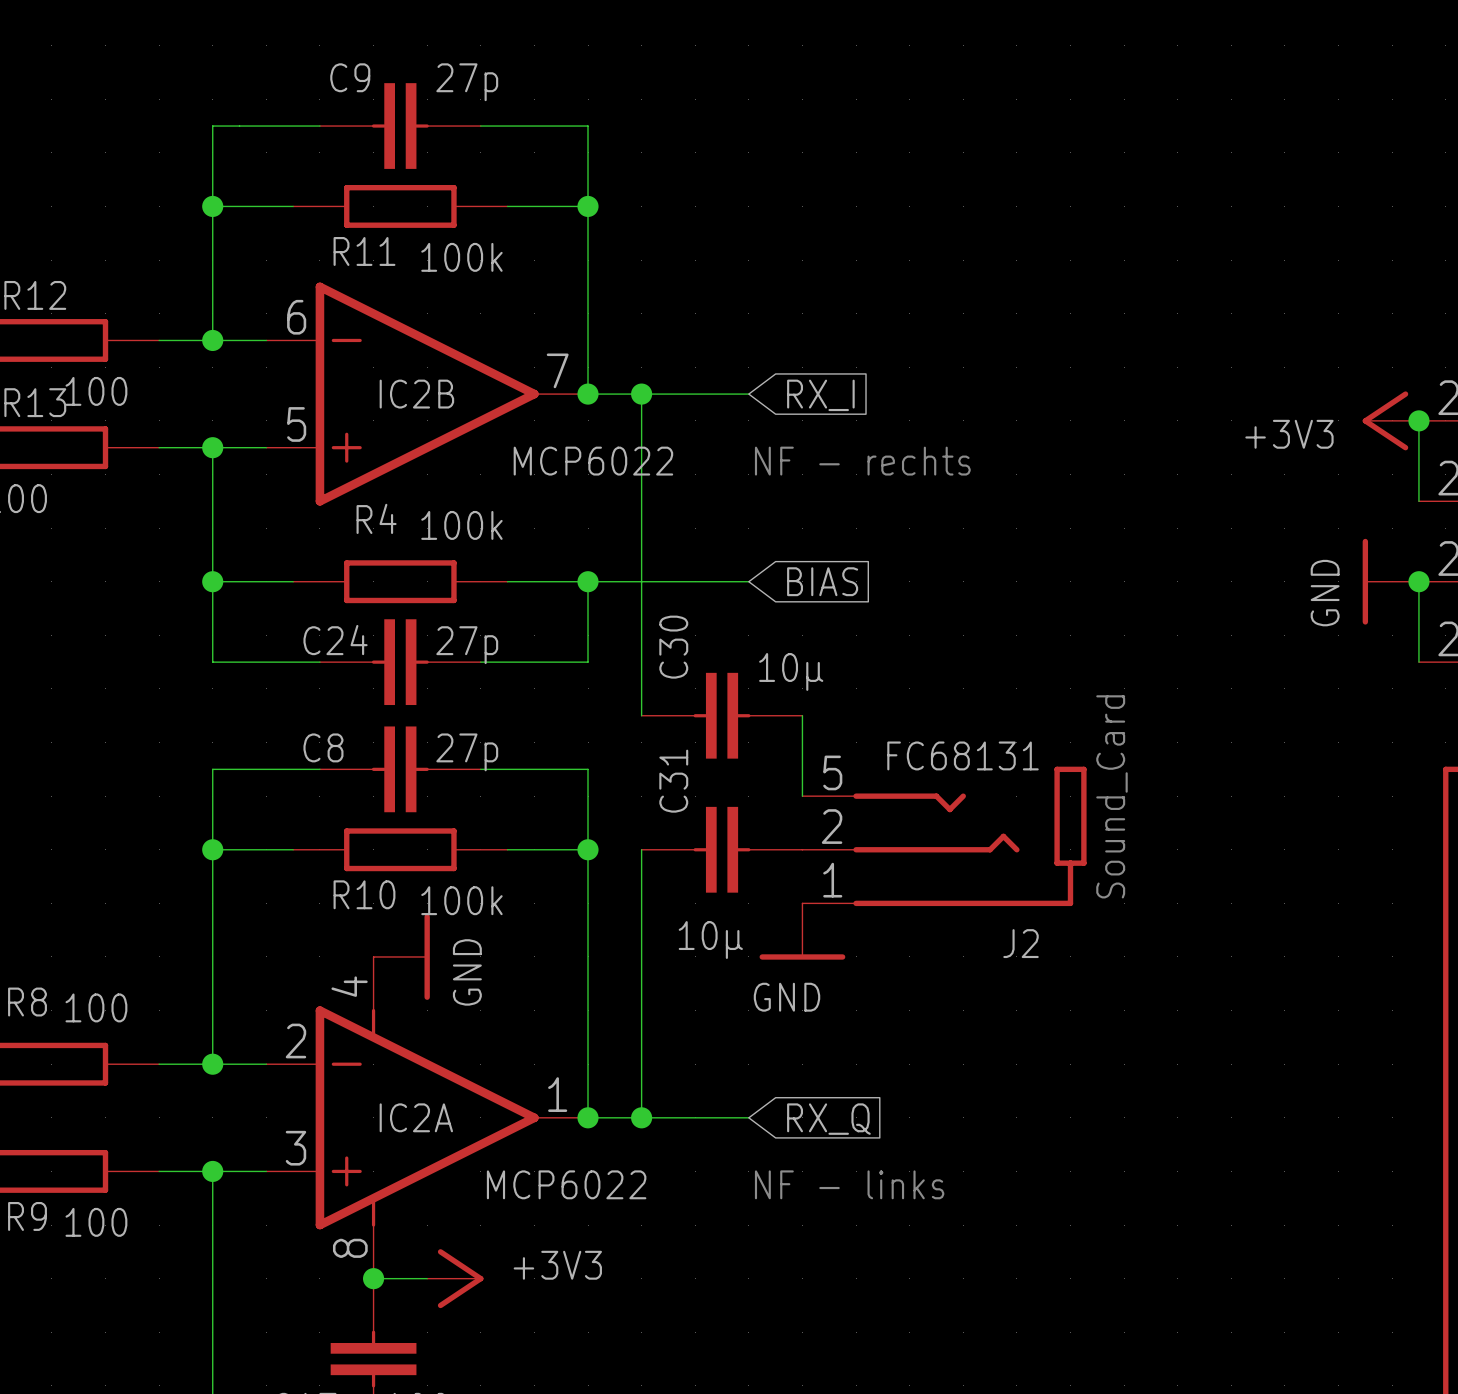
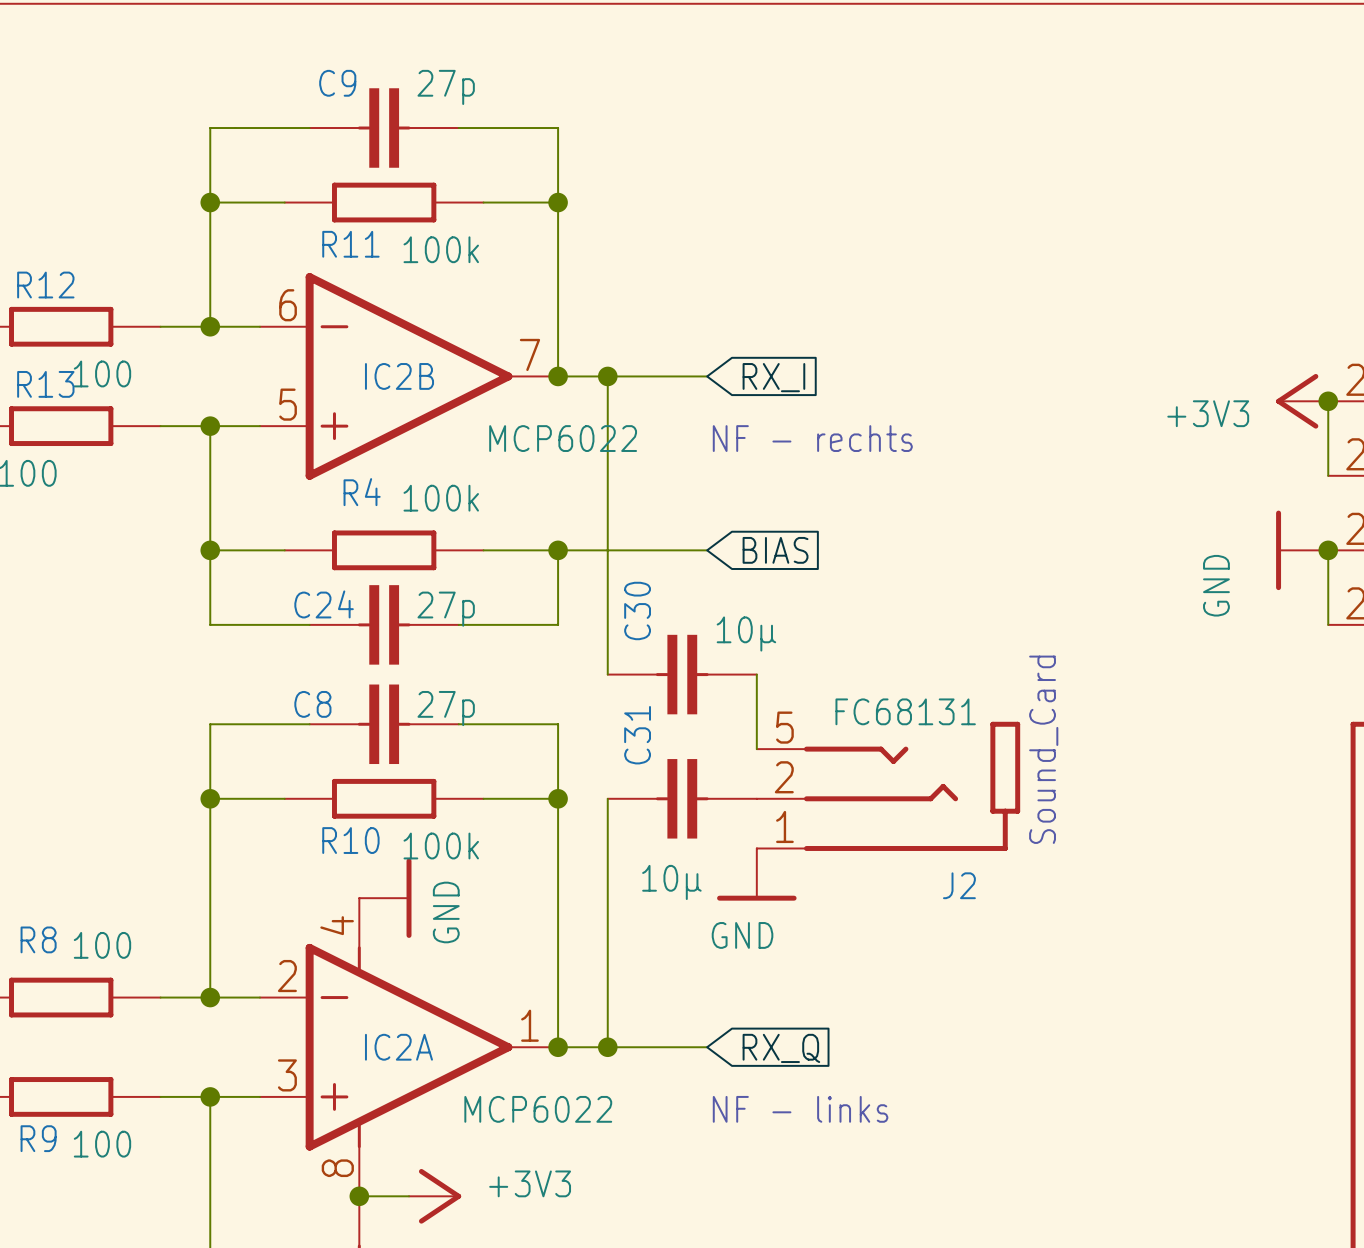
power symbol text position: GND (1325, 593) -> GND (1216, 585)

